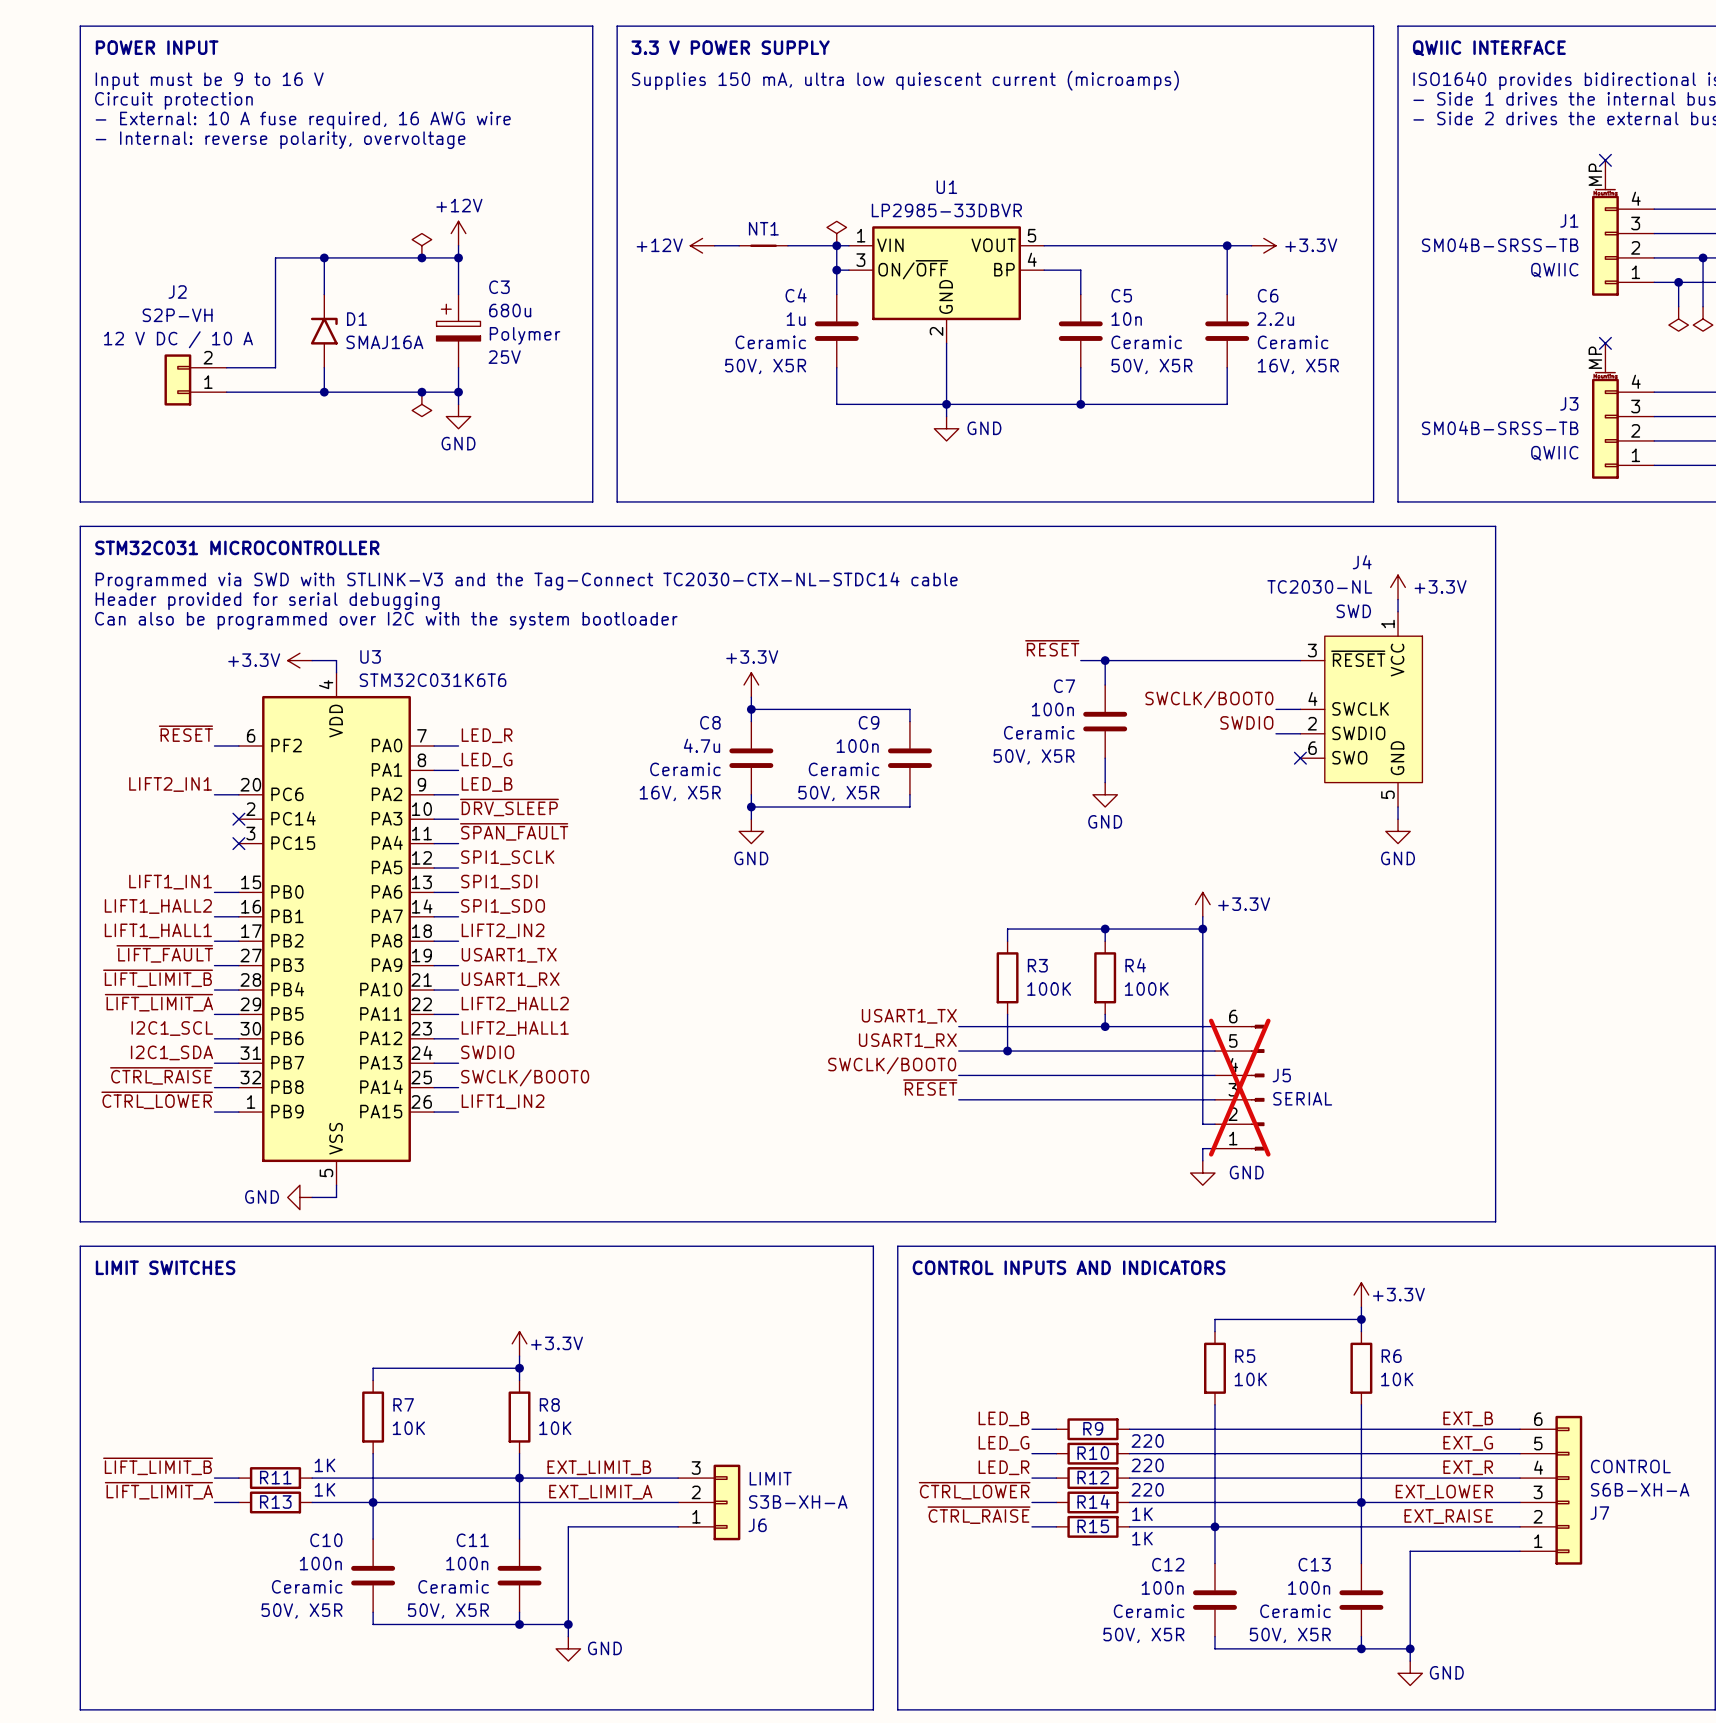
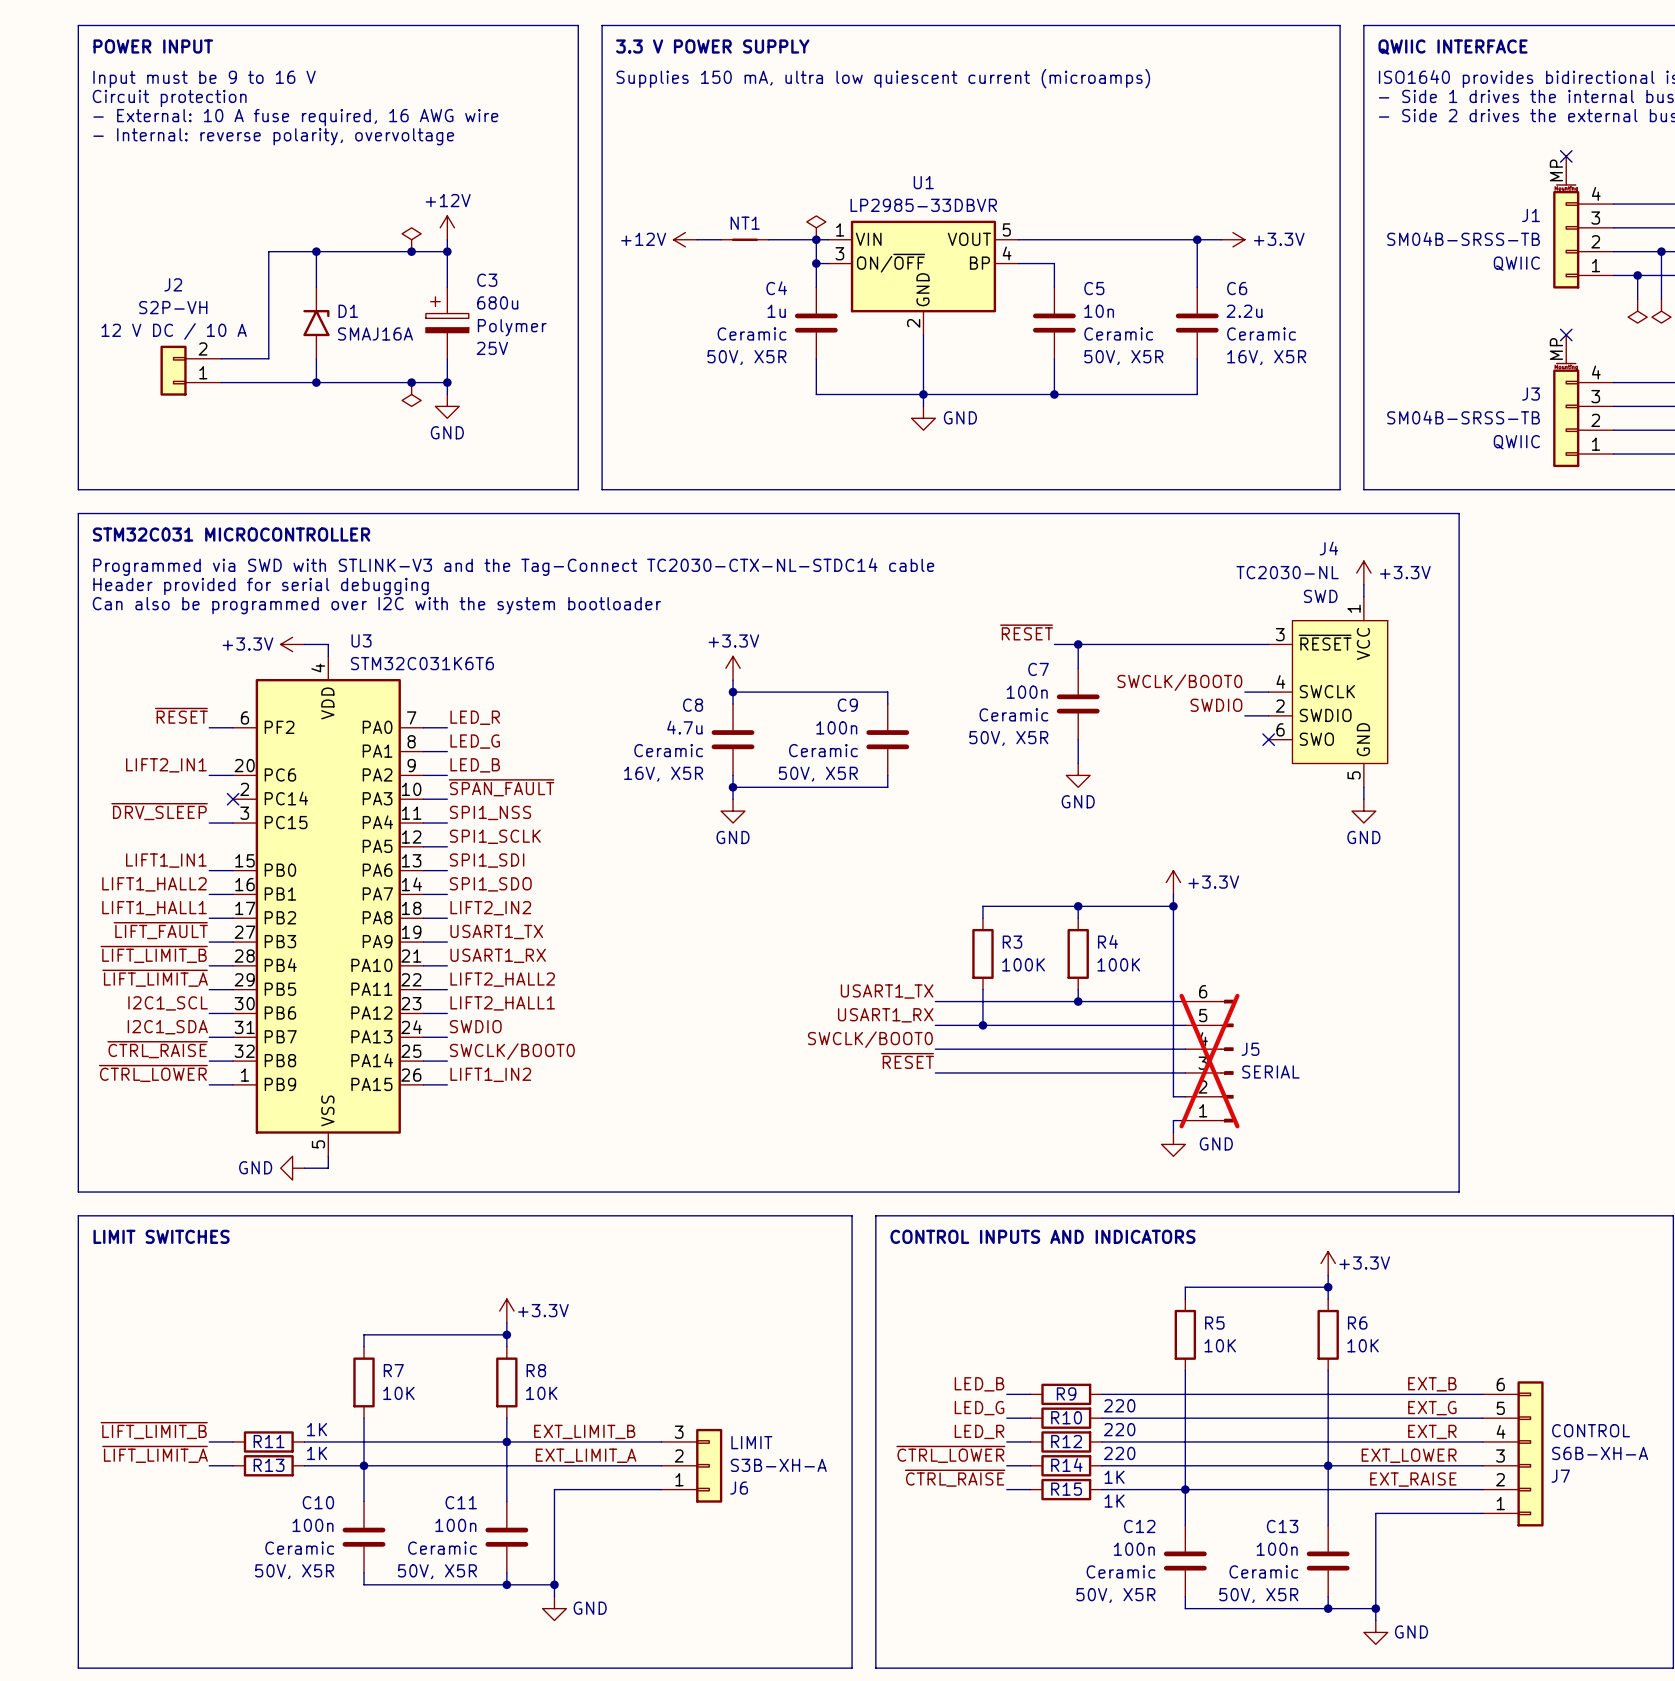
label: ~{DRV_SLEEP} (509, 807) -> ~{SPAN_FAULT} (501, 787)
label: none -> ~{DRV_SLEEP} (159, 811)
label: ~{SPAN_FAULT} (514, 831) -> SPI1_NSS (490, 812)
wire: none -> (209, 823) (233, 823)
no-connect mark: (238, 843) -> none

